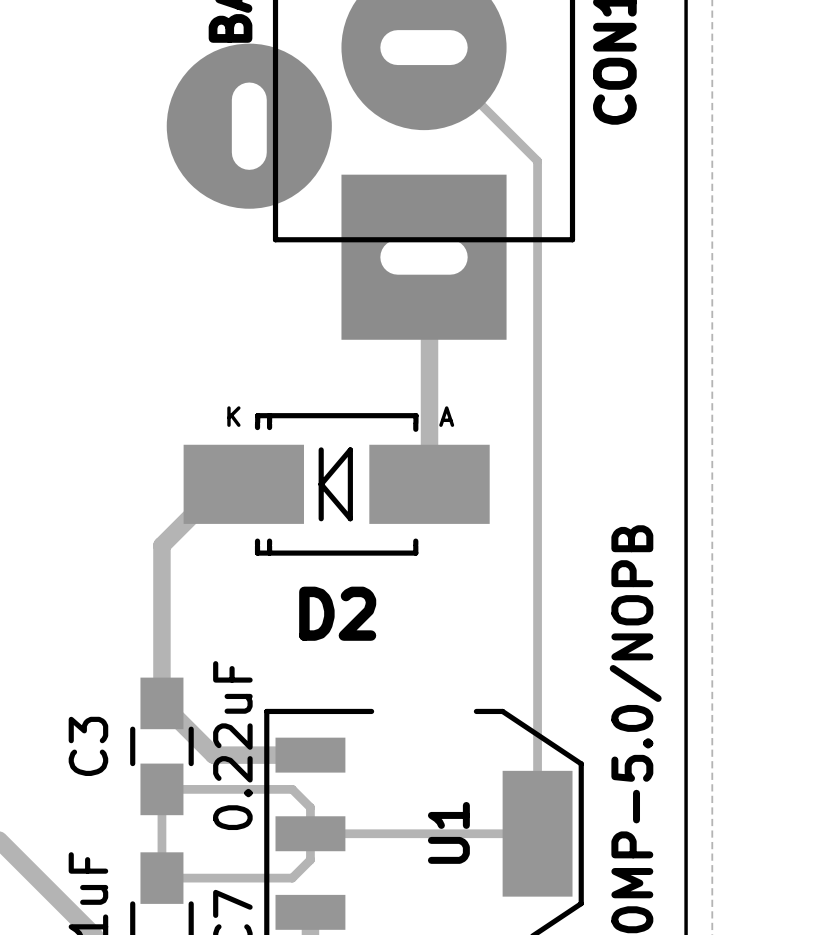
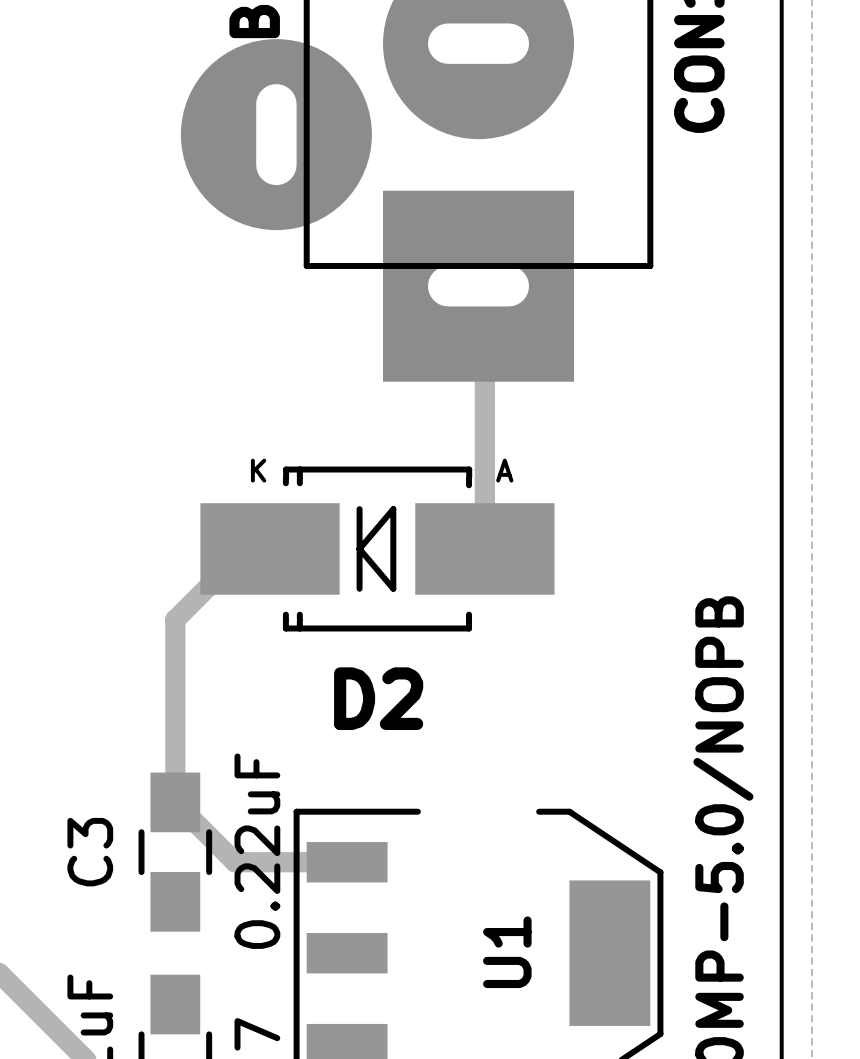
track: (424, 47) (537, 161) (537, 833) (310, 833) -> none
track: (161, 789) (161, 878) (292, 878) (310, 859) (310, 807) (292, 789) (161, 789) -> none

